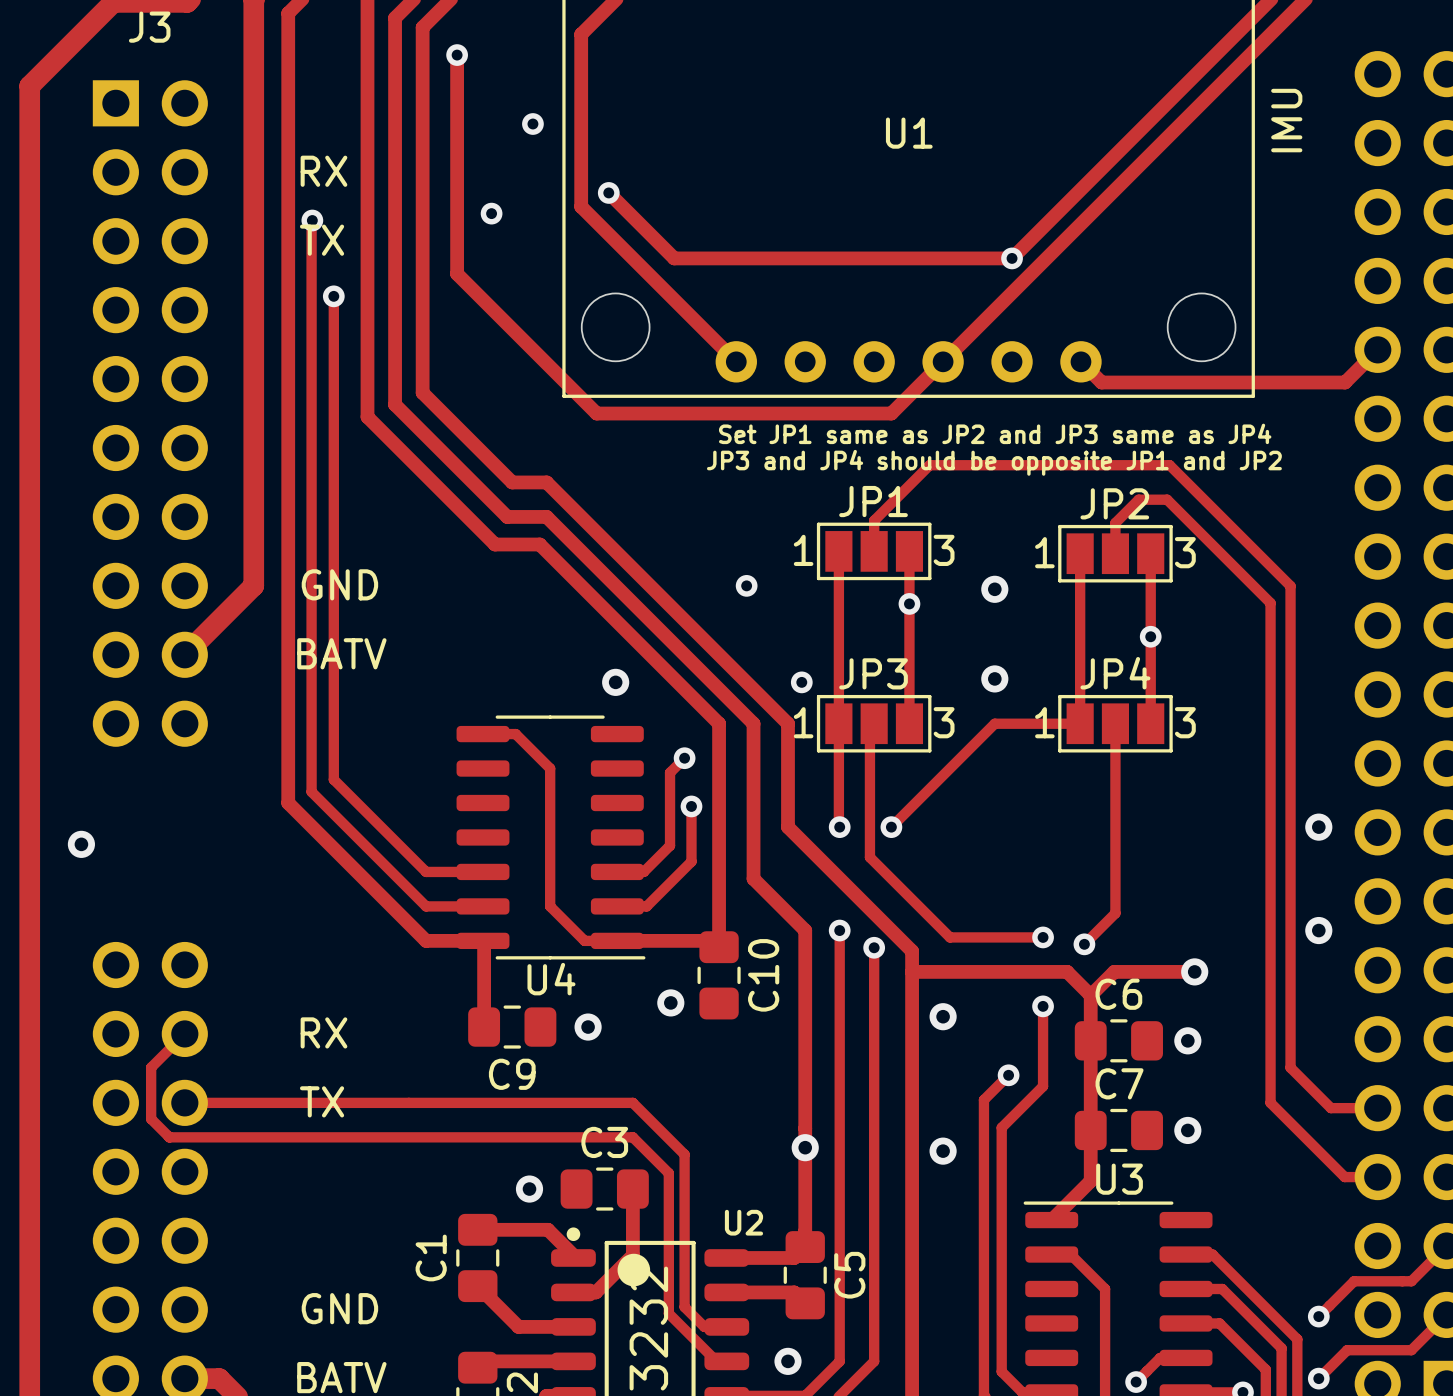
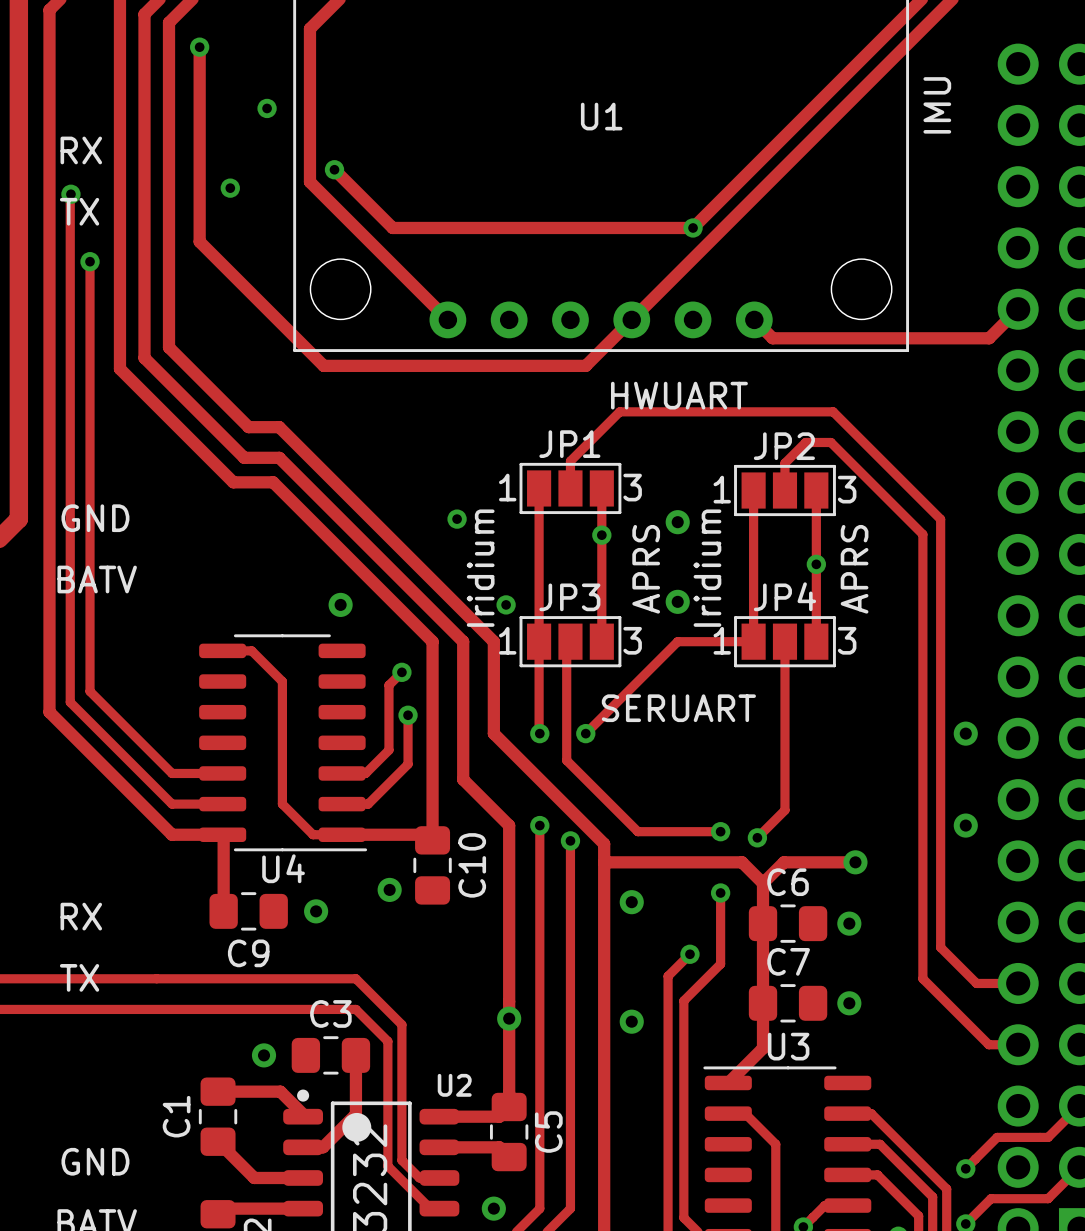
text: Set JP1 same as JP2 and JP3 same as JP4 (995, 433) -> none
text: none -> HWUART (679, 395)
text: JP3 and JP4 should be opposite JP1 and JP2 (994, 462) -> none
text: none -> Iridium (480, 568)
text: none -> Iridium (707, 568)
text: none -> APRS (646, 569)
text: none -> APRS (854, 569)
text: none -> SERUART (678, 708)

